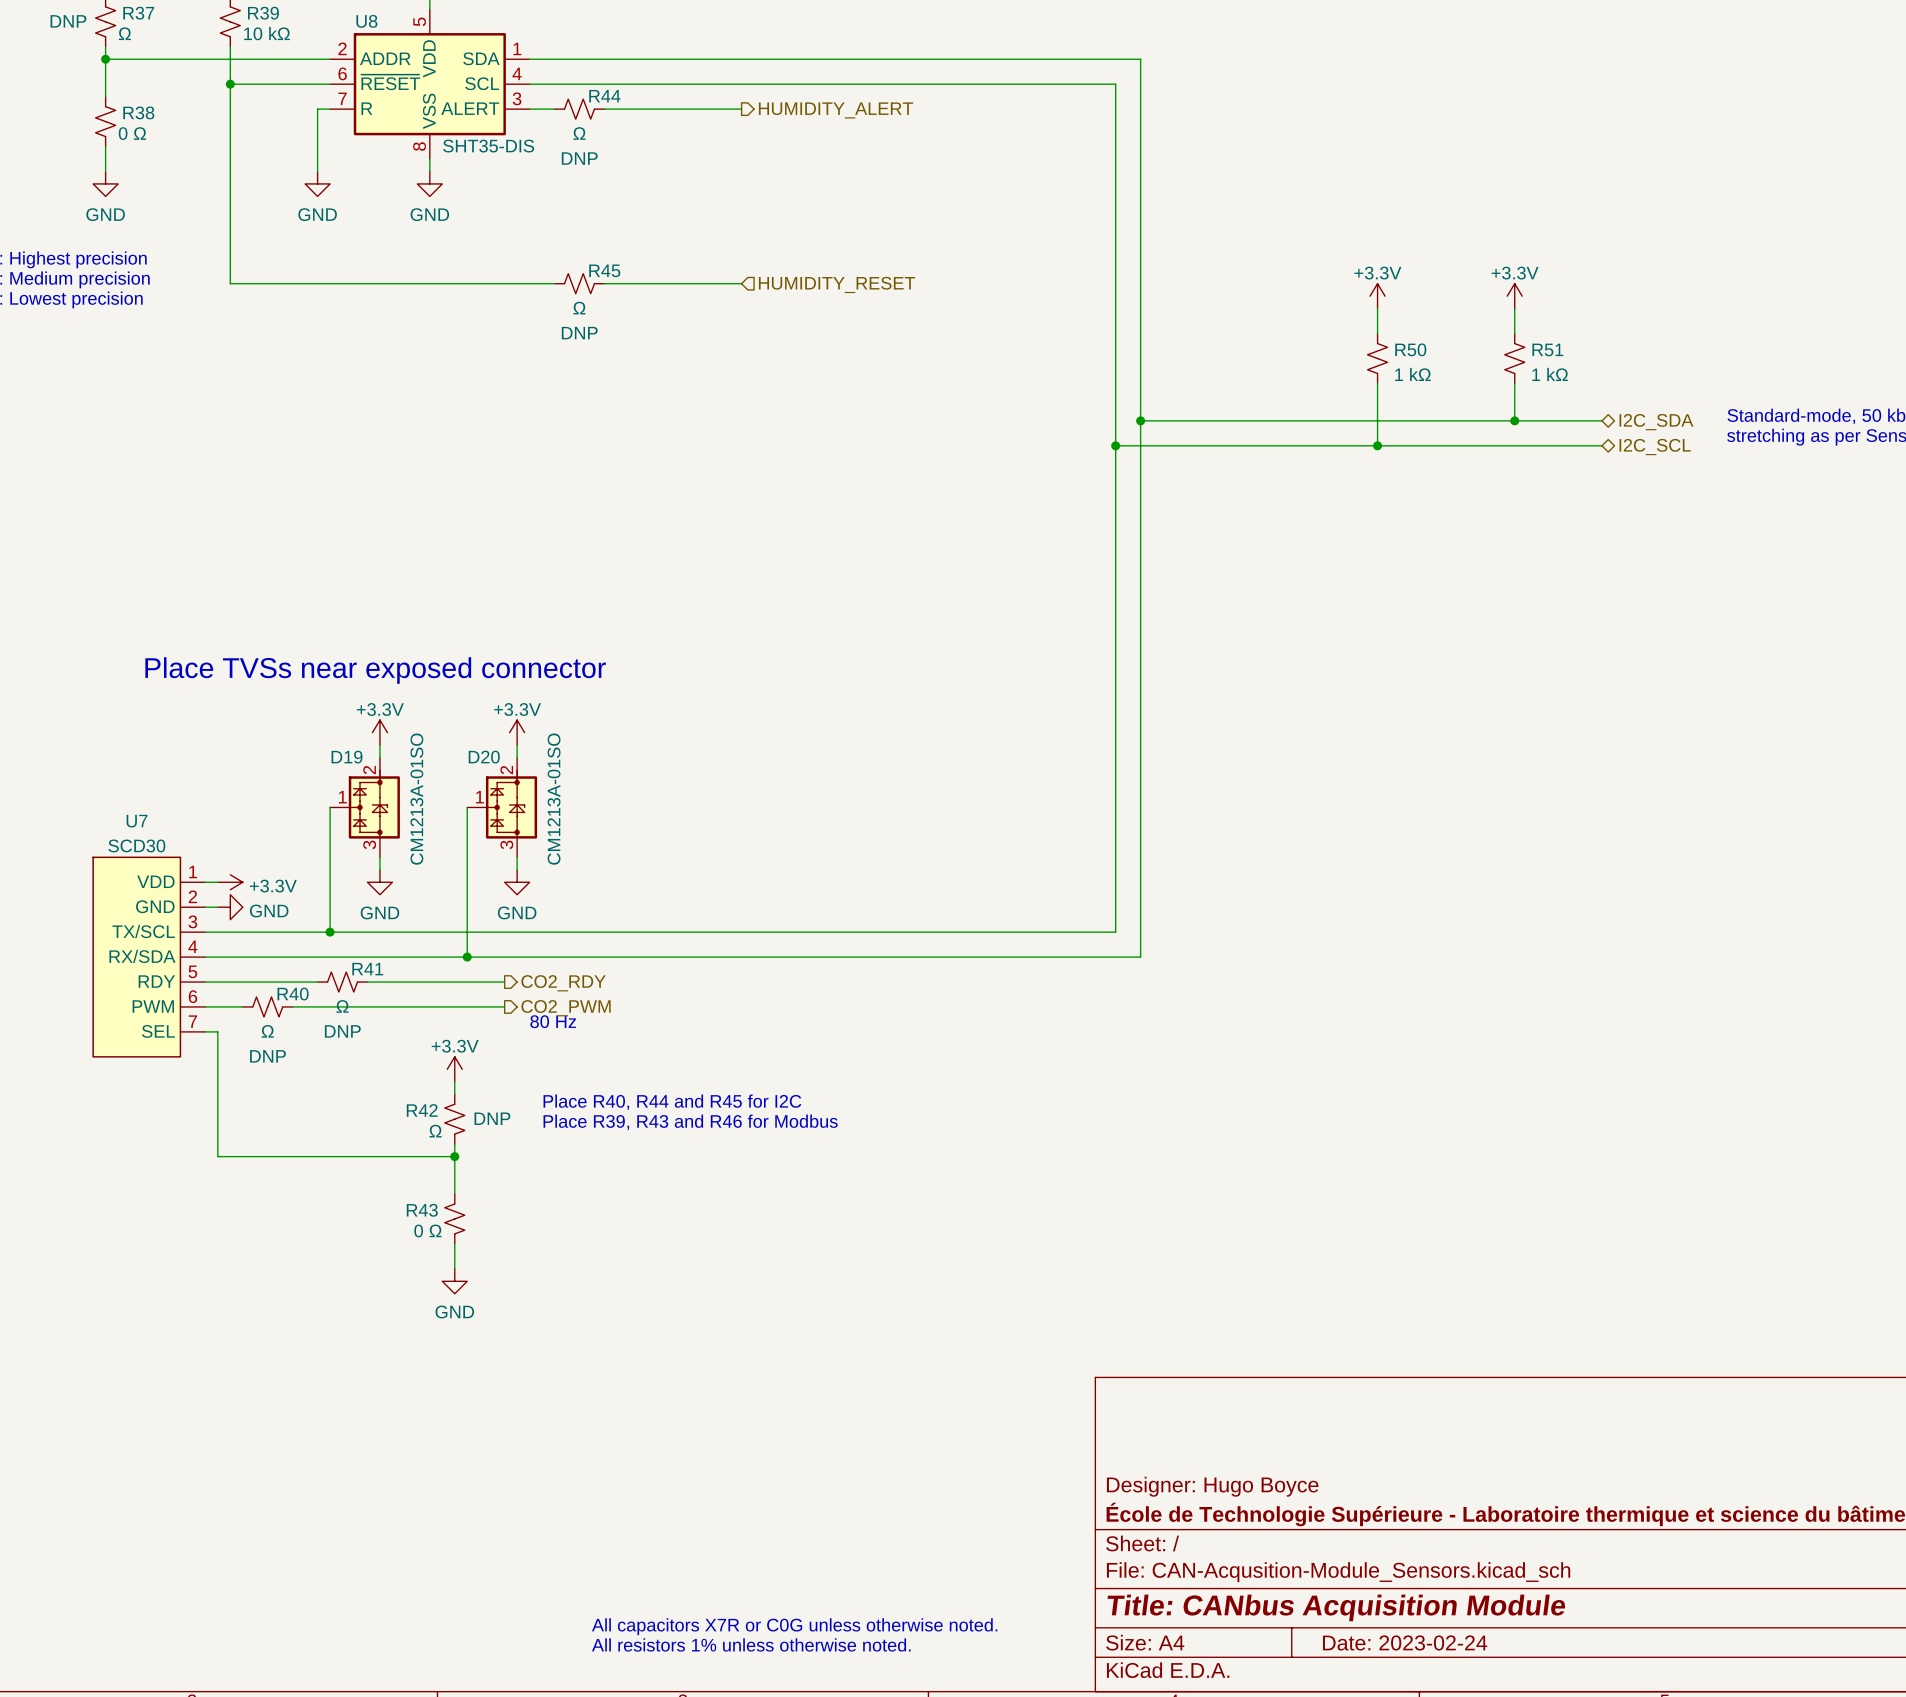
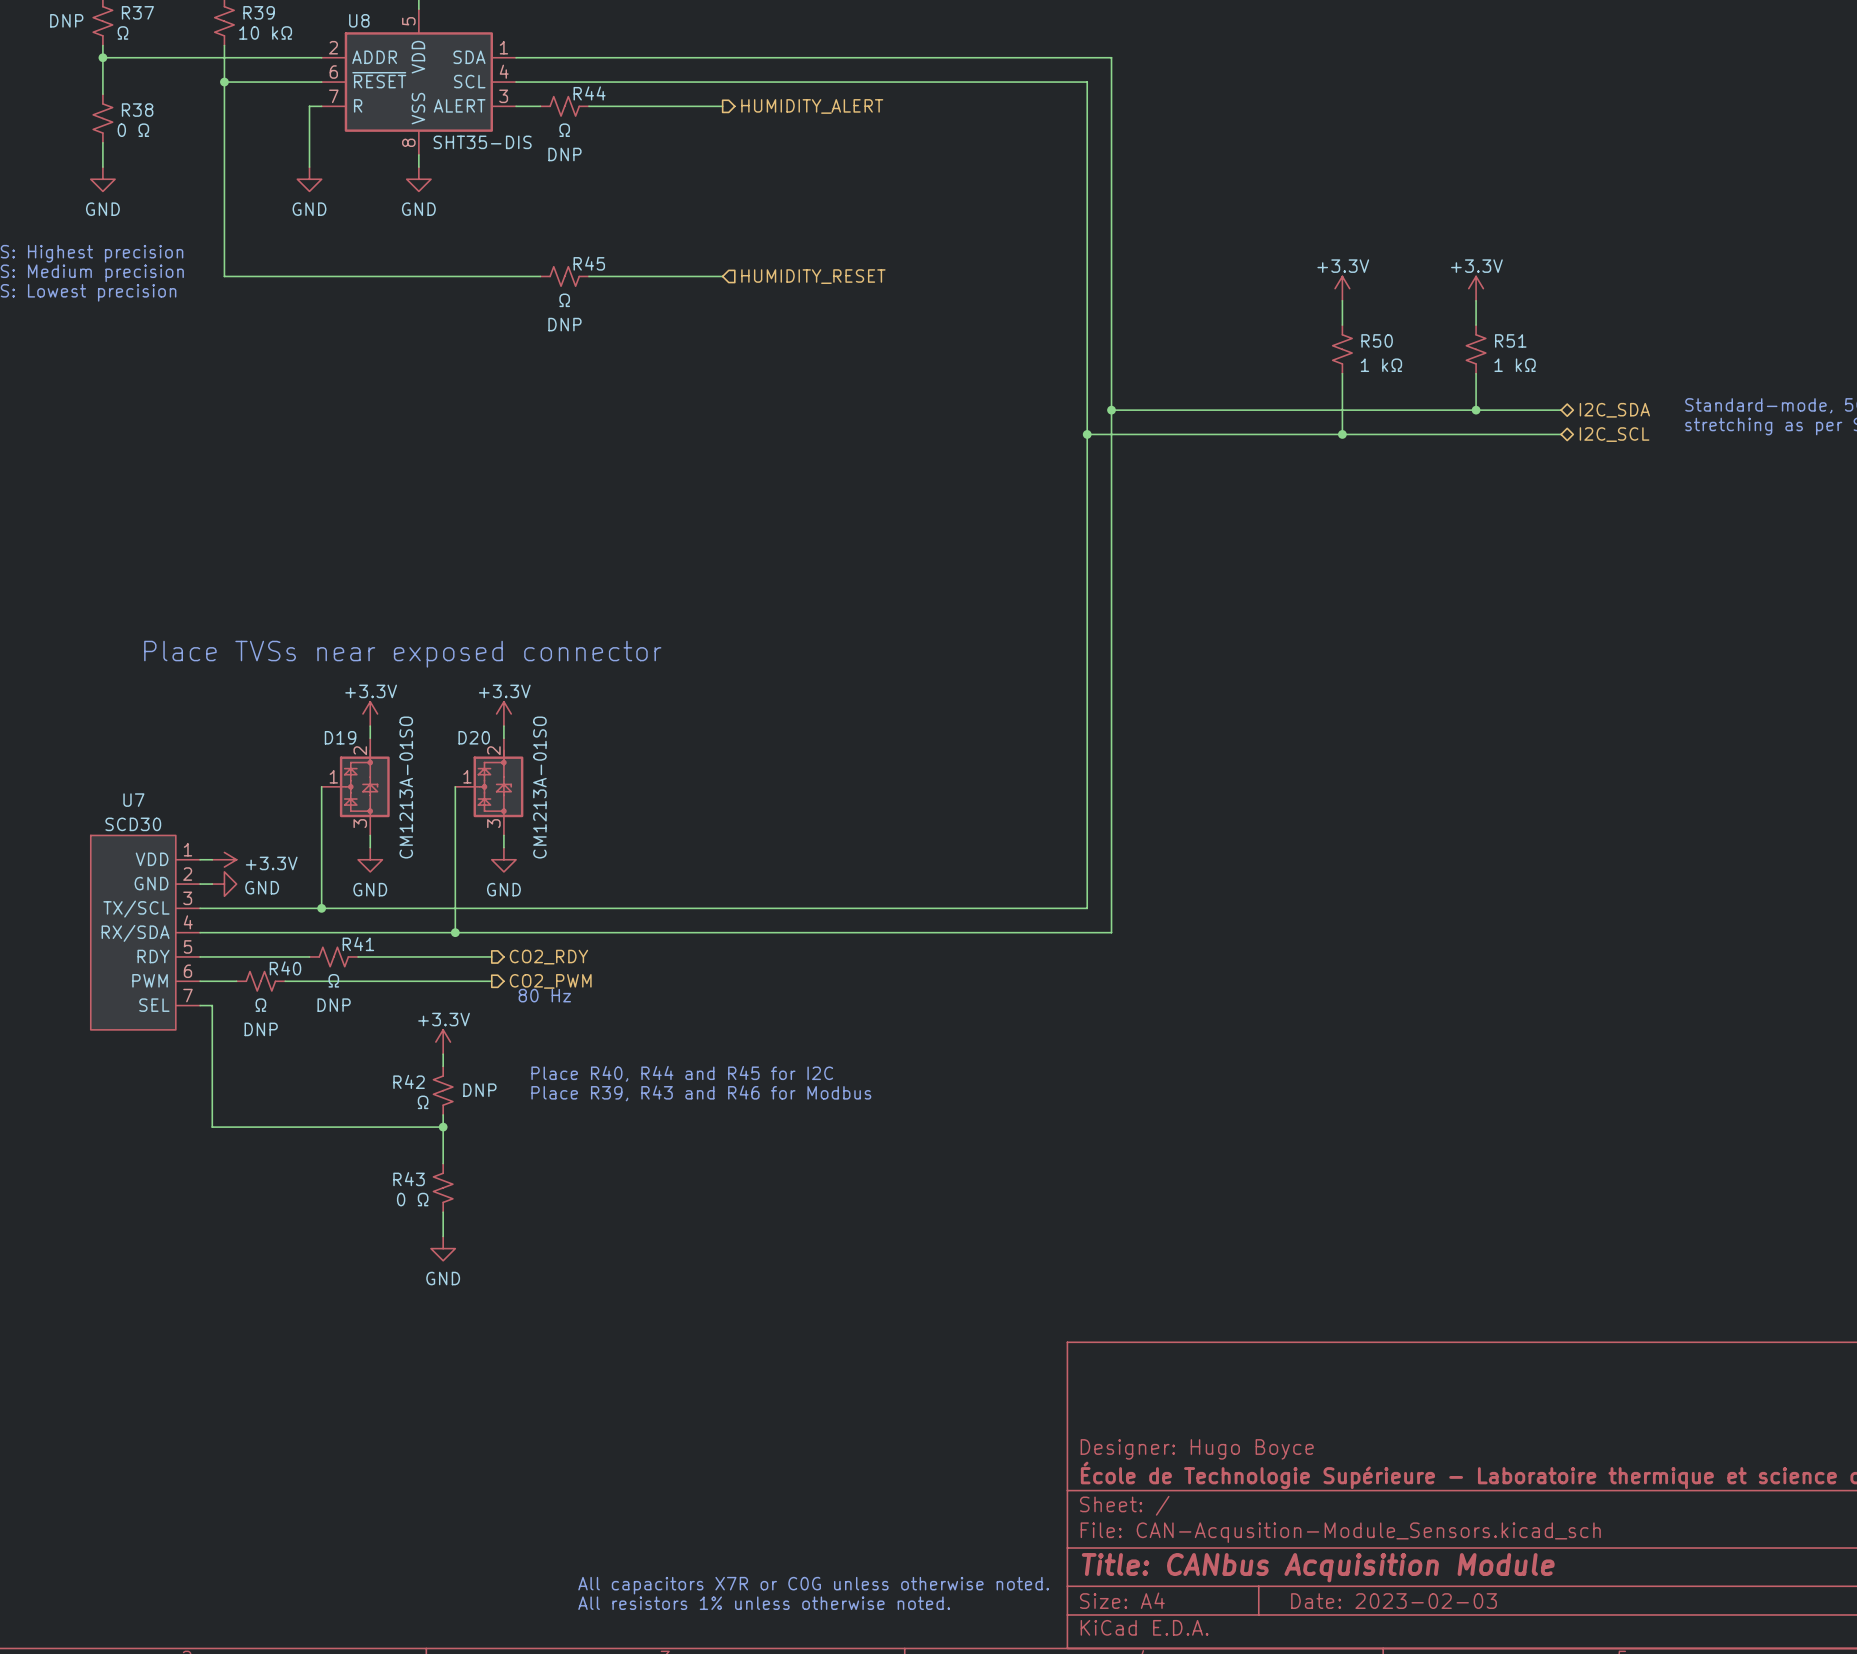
title block: Date: 2023-02-24 (1405, 1642) -> Date: 2023-02-03 (1394, 1601)

